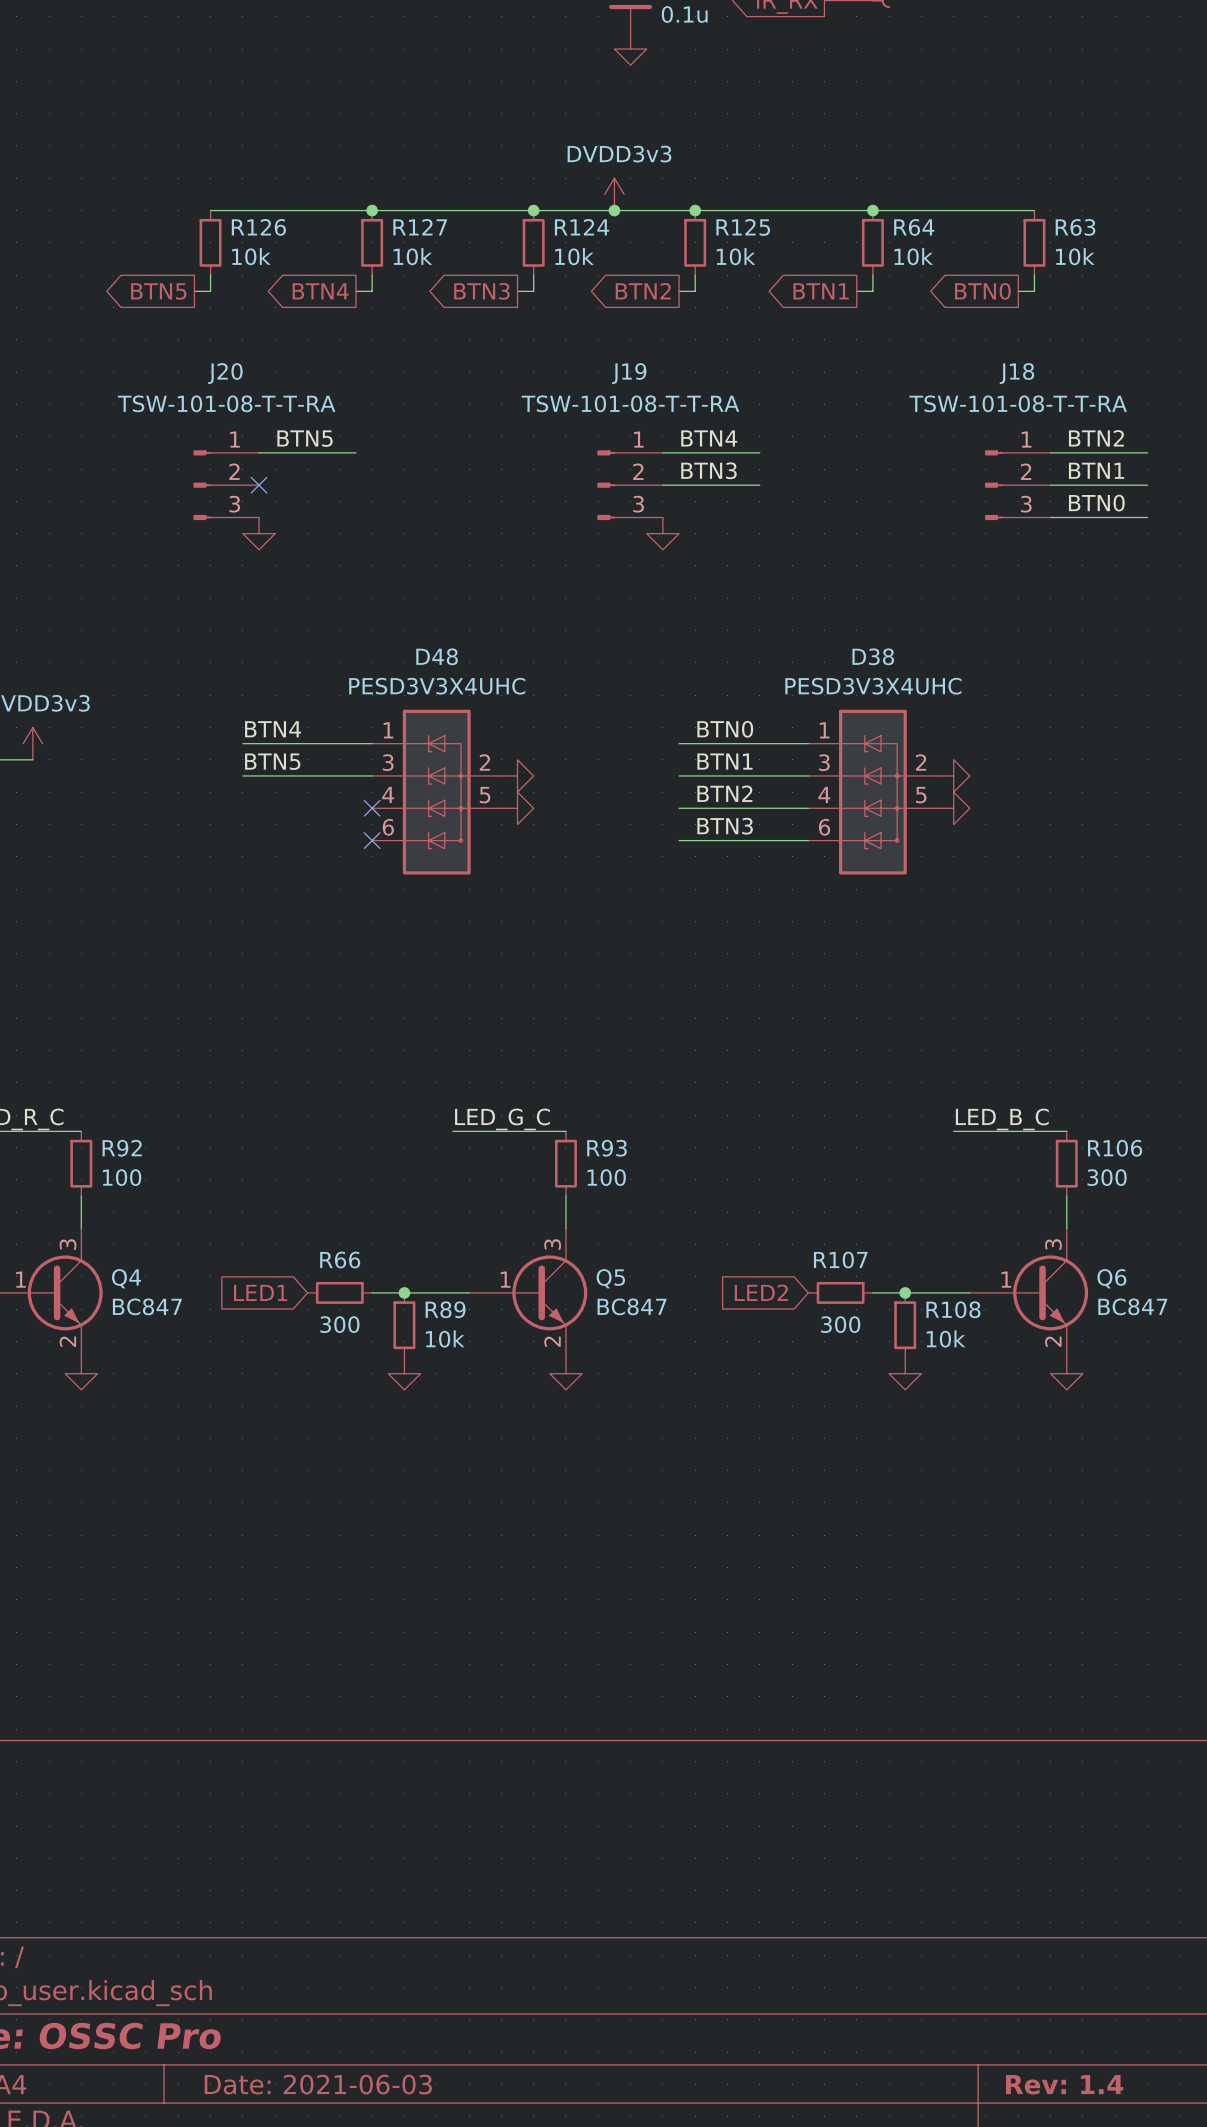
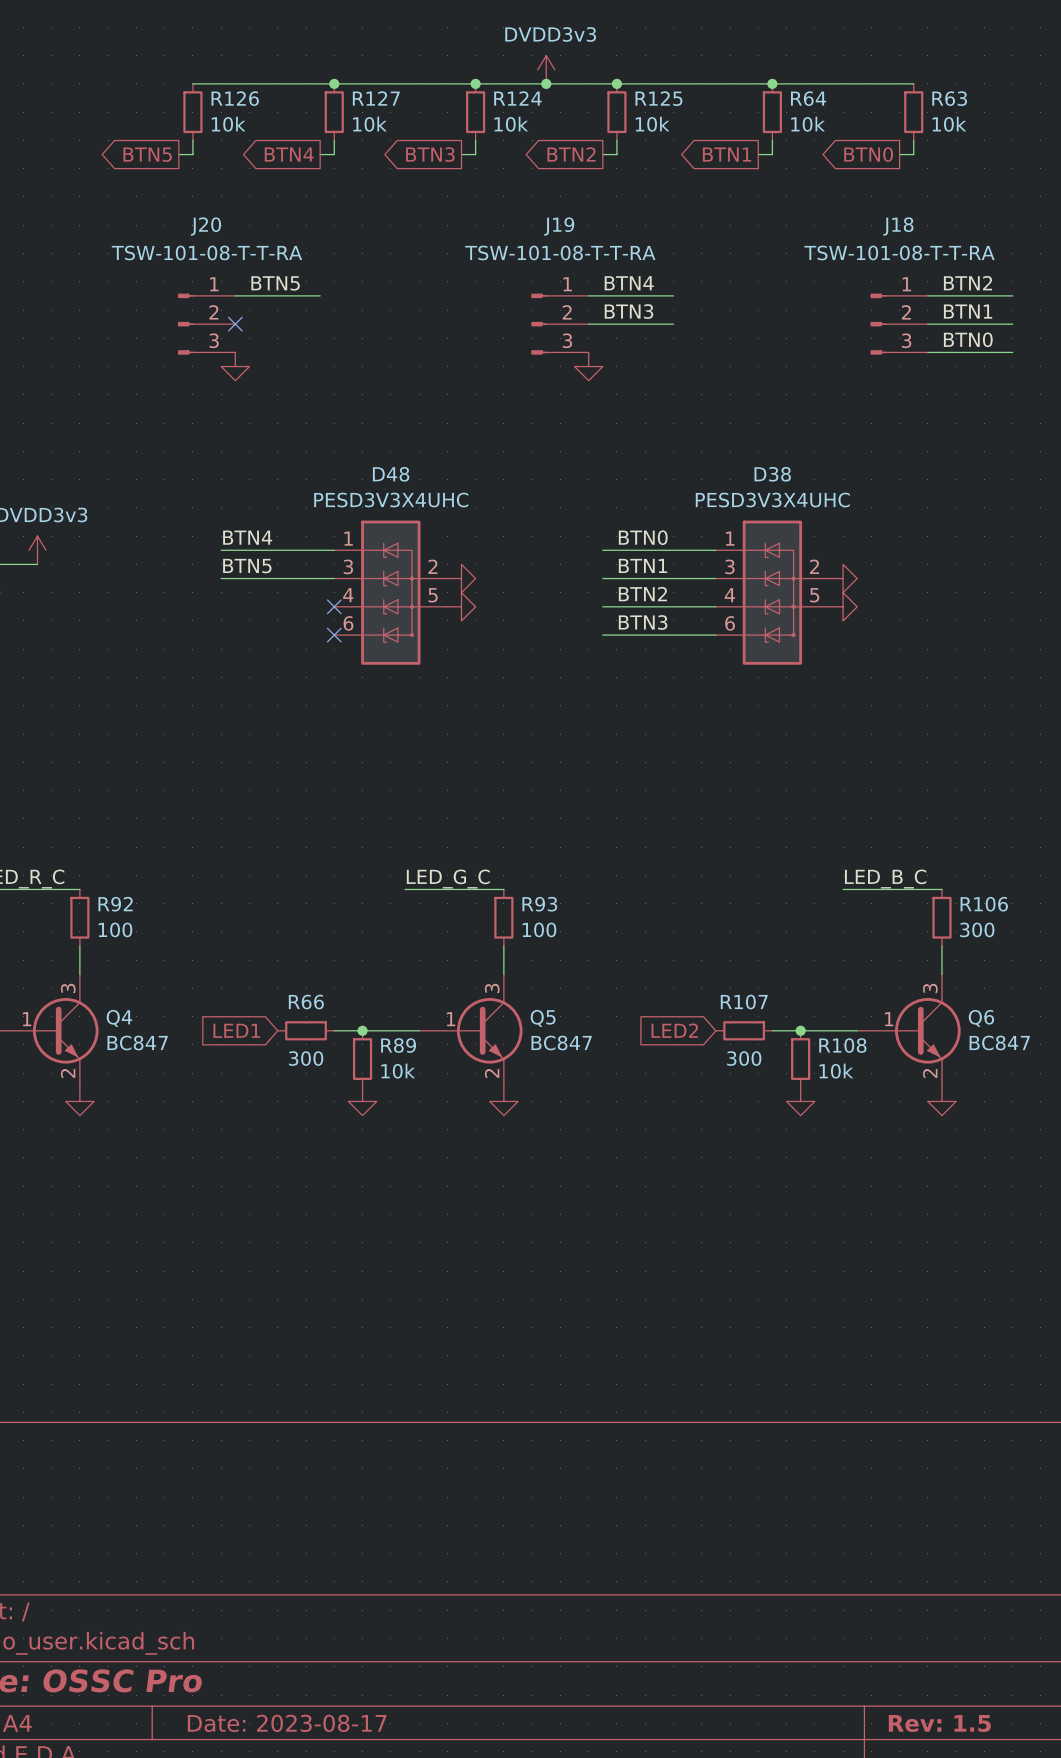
title block: Date: 2021-06-03 (318, 2084) -> Date: 2023-08-17 (287, 1723)
title block: Rev: 1.4 (1064, 2084) -> Rev: 1.5 (939, 1723)

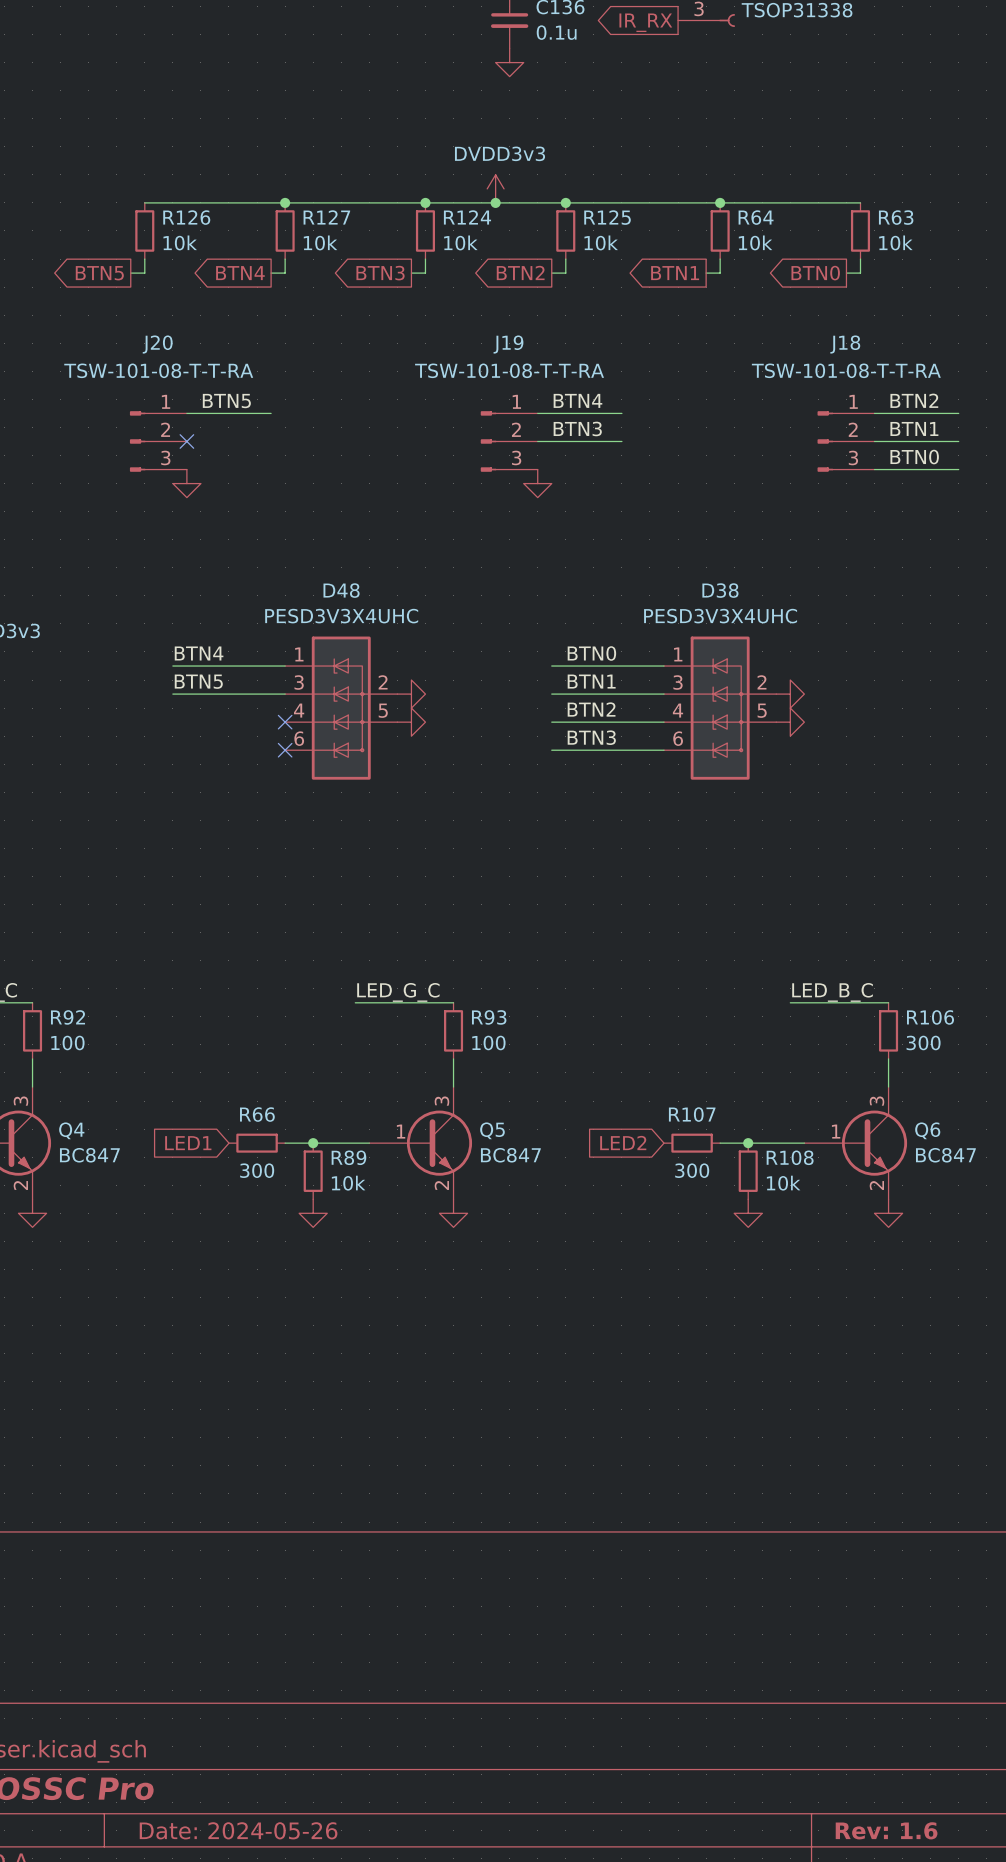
title block: Date: 2023-08-17 (287, 1723) -> Date: 2024-05-26 (238, 1830)
title block: Rev: 1.5 (939, 1723) -> Rev: 1.6 (886, 1830)

